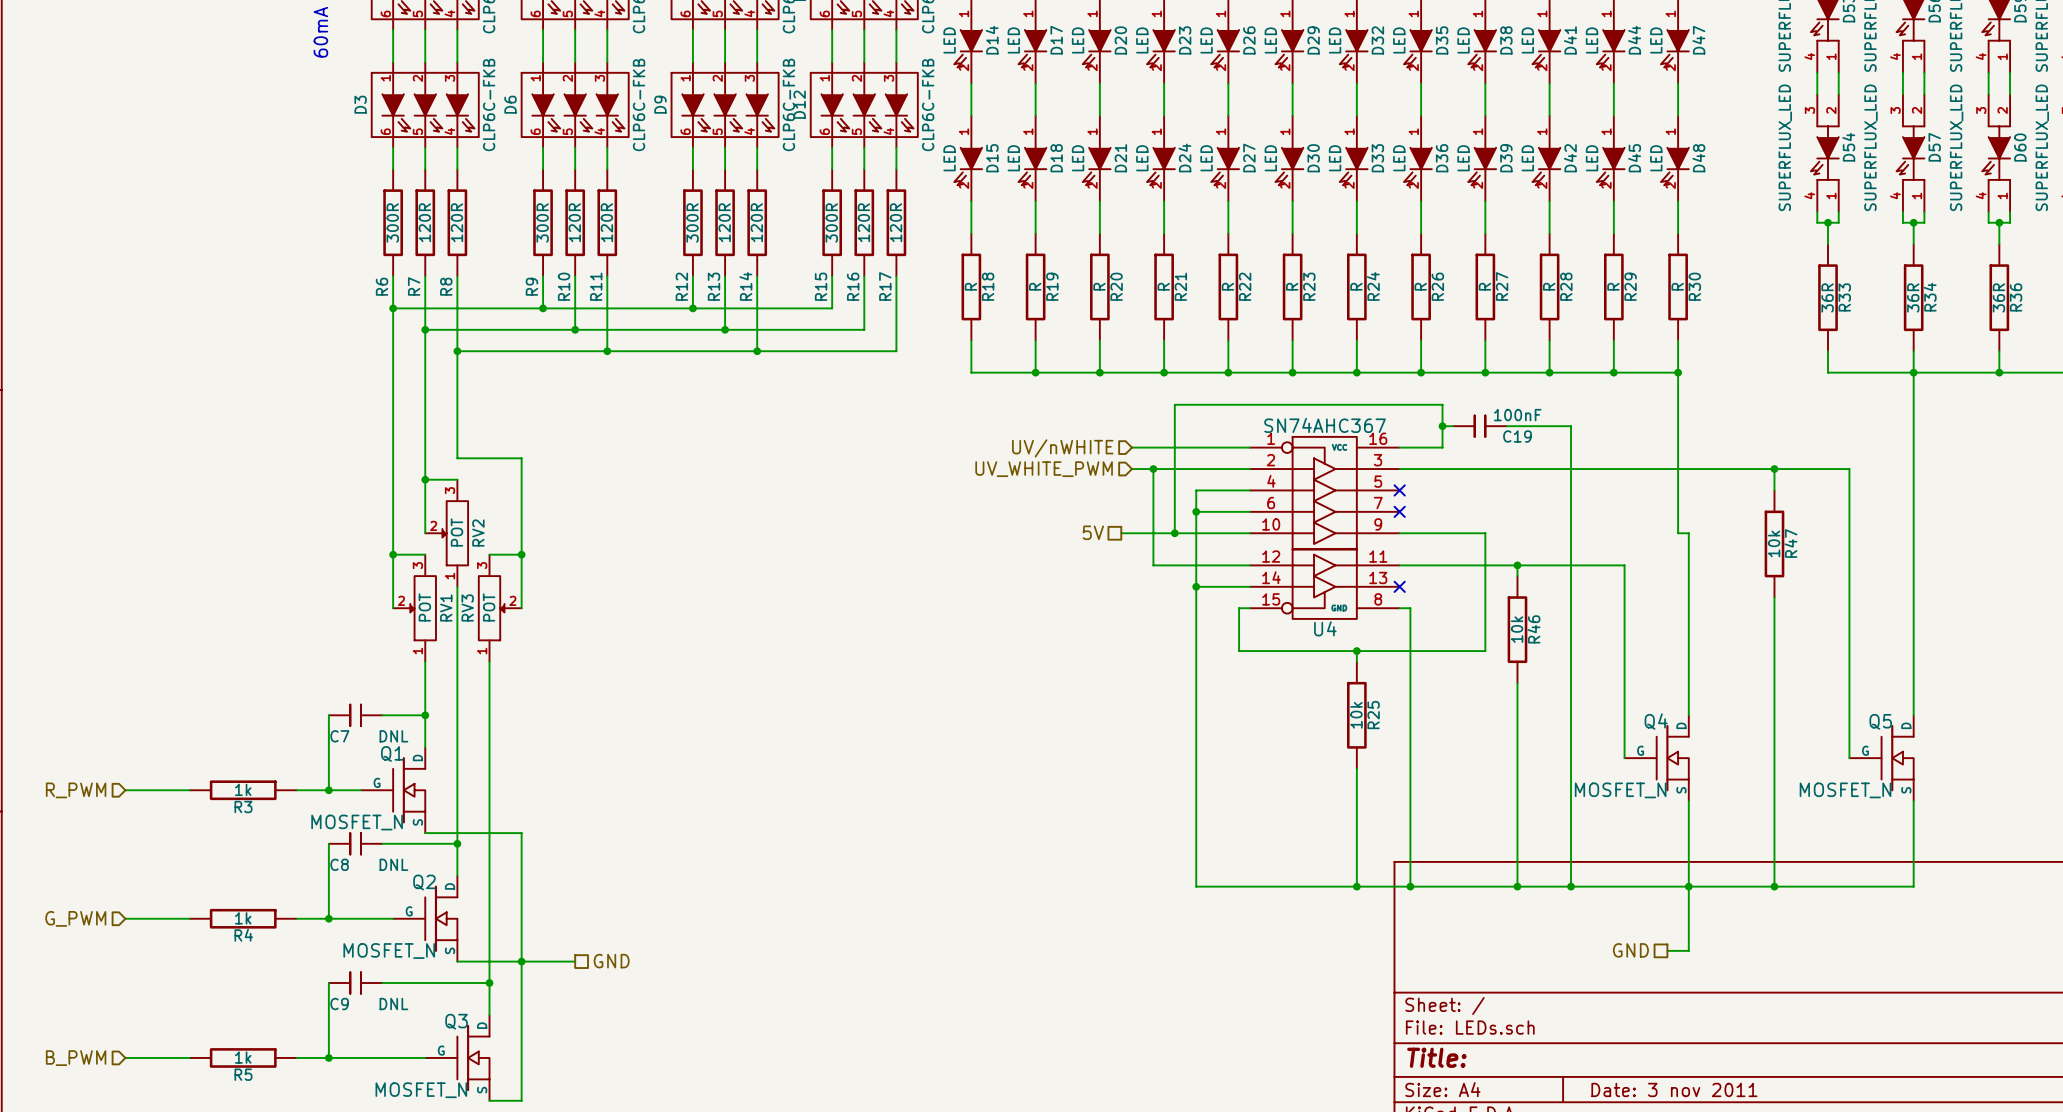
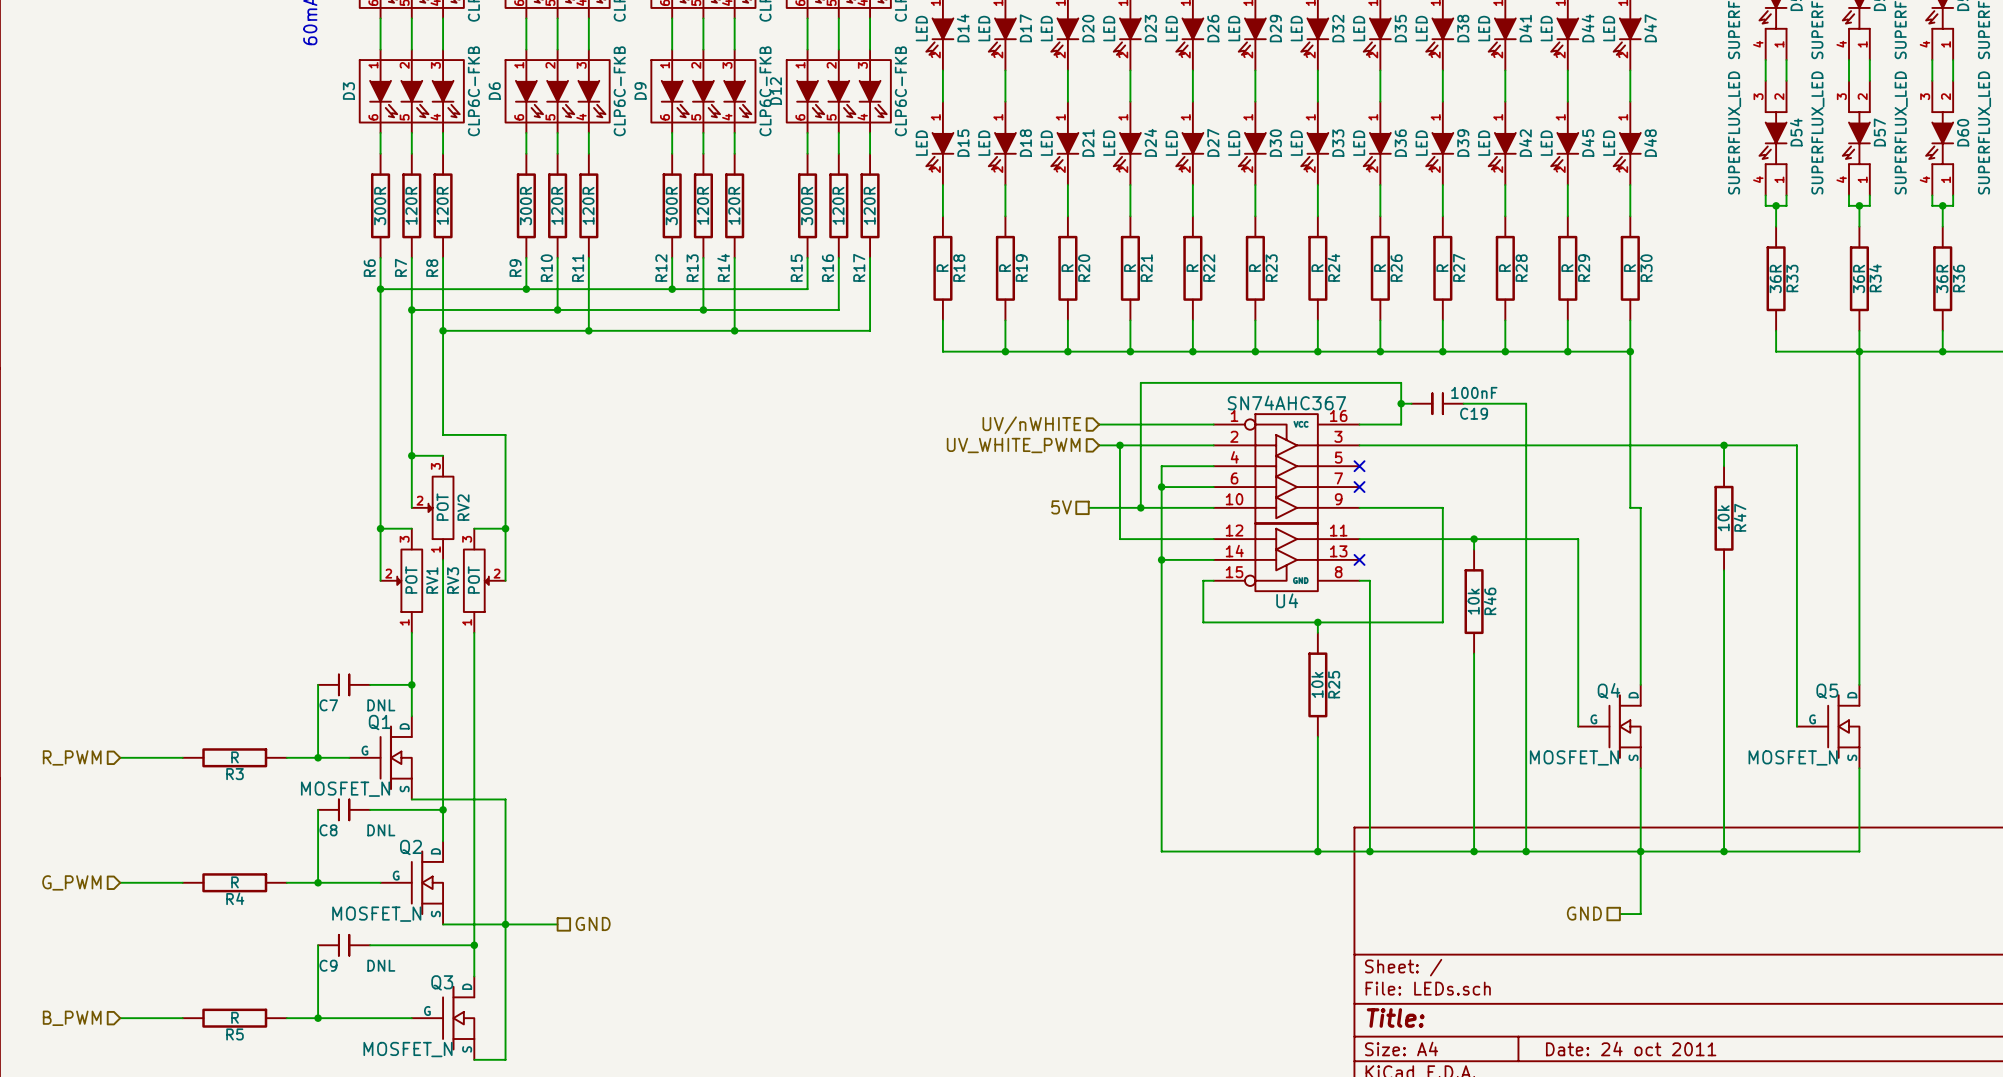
R3 value: 1k (243, 789) -> R (235, 757)
R4 value: 1k (243, 918) -> R (235, 882)
R5 value: 1k (243, 1057) -> R (235, 1017)
title block: Date: 3 nov 2011 (1674, 1089) -> Date: 24 oct 2011 (1631, 1049)

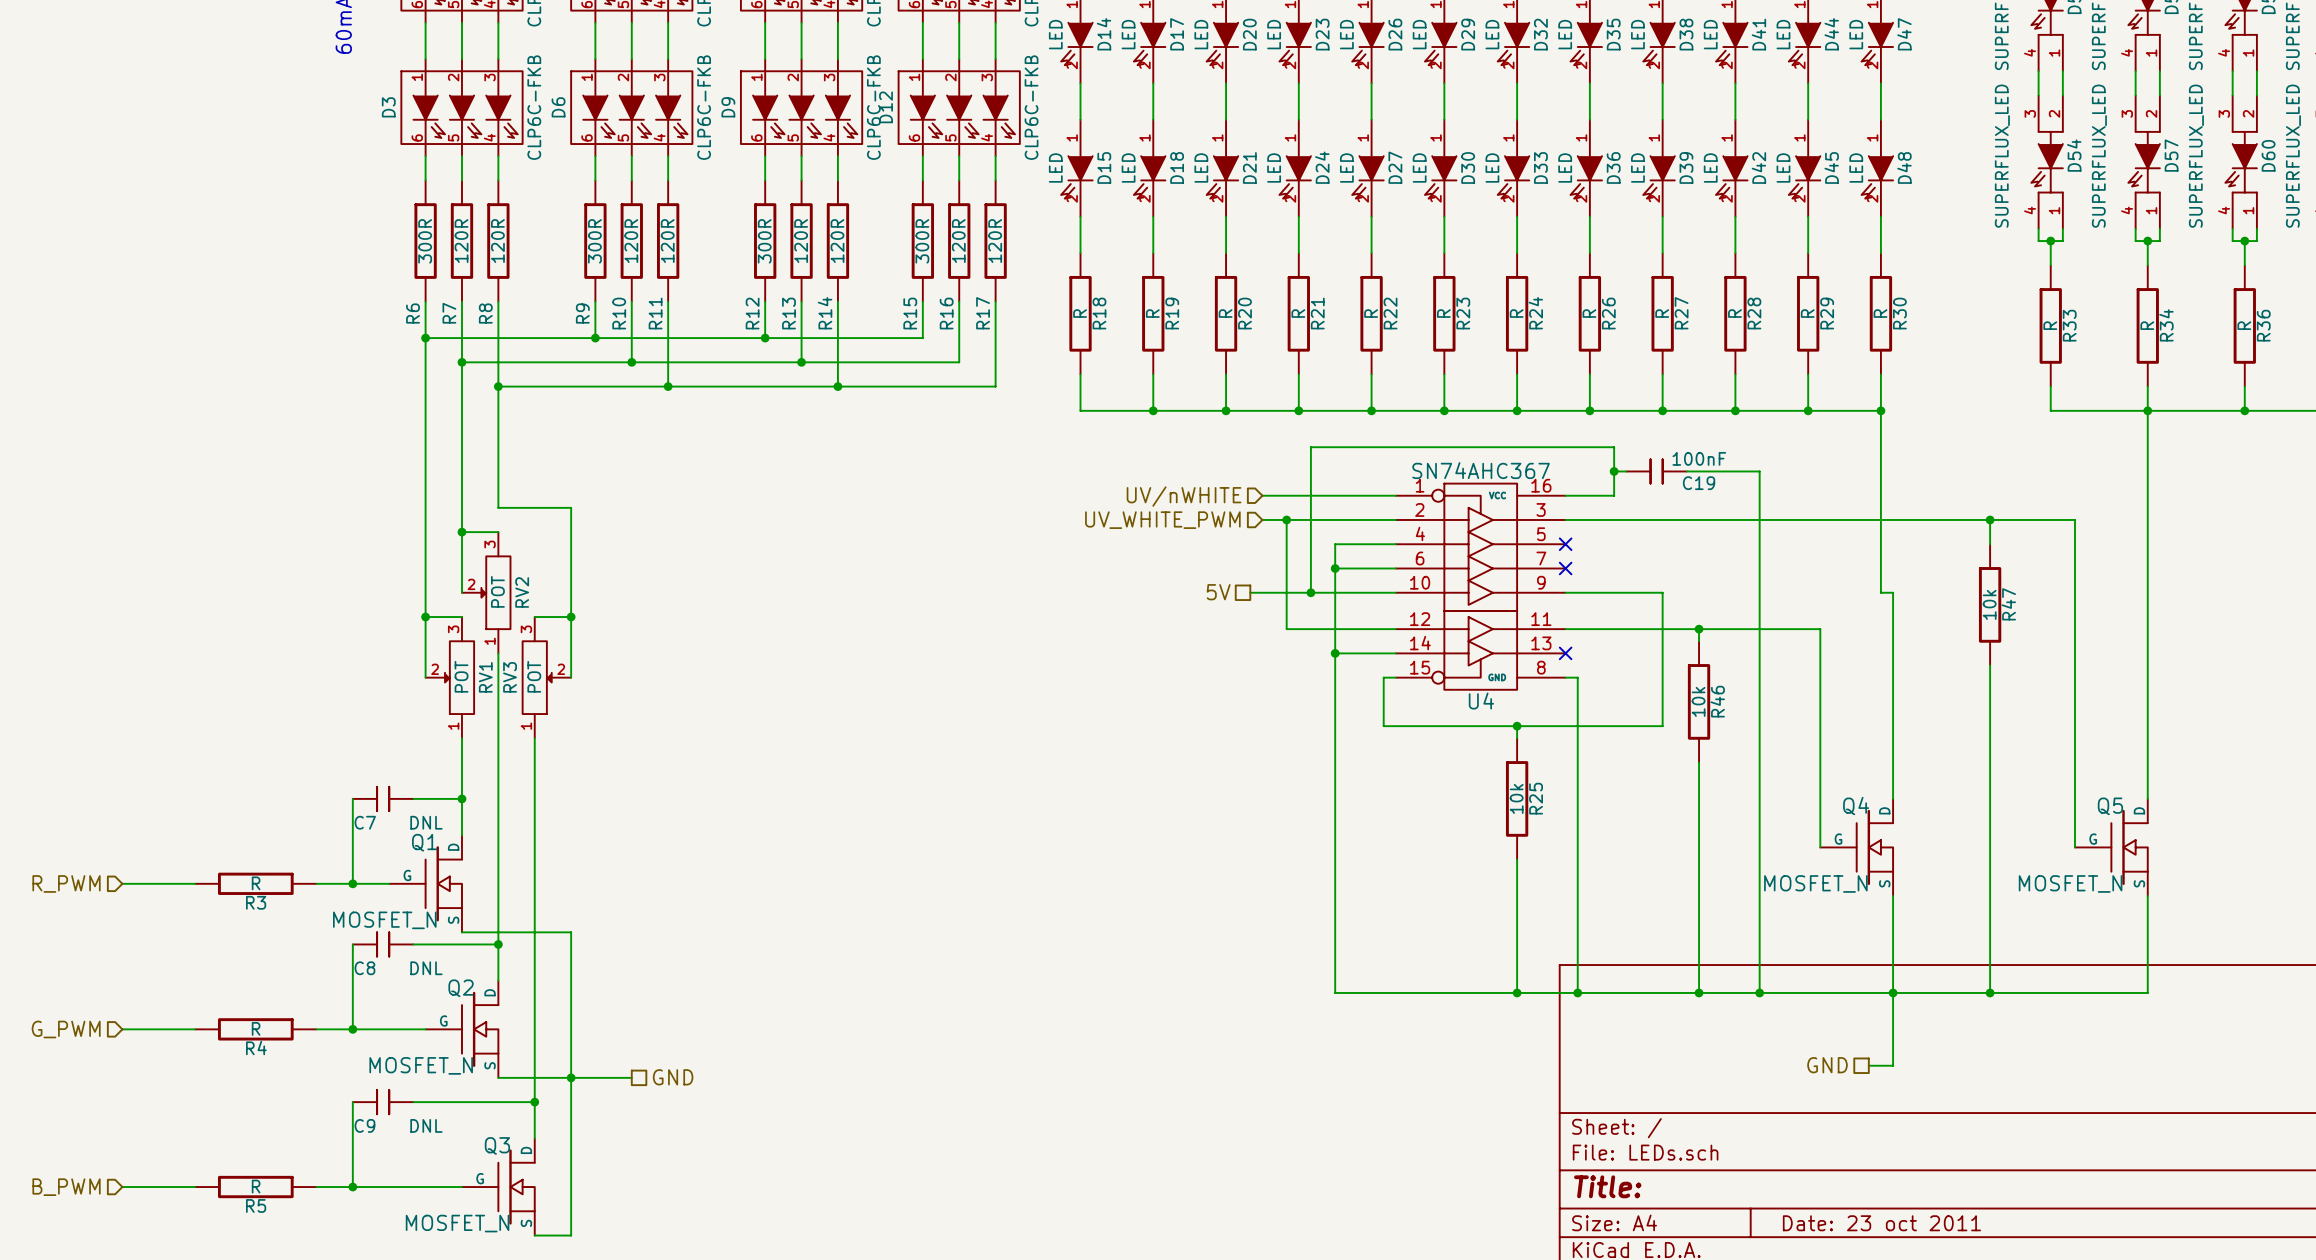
R33 value: 36R (1775, 278) -> R (2050, 325)
R34 value: 36R (1859, 278) -> R (2147, 325)
R36 value: 36R (1942, 278) -> R (2244, 325)
title block: Date: 24 oct 2011 (1631, 1049) -> Date: 23 oct 2011 (1881, 1223)

